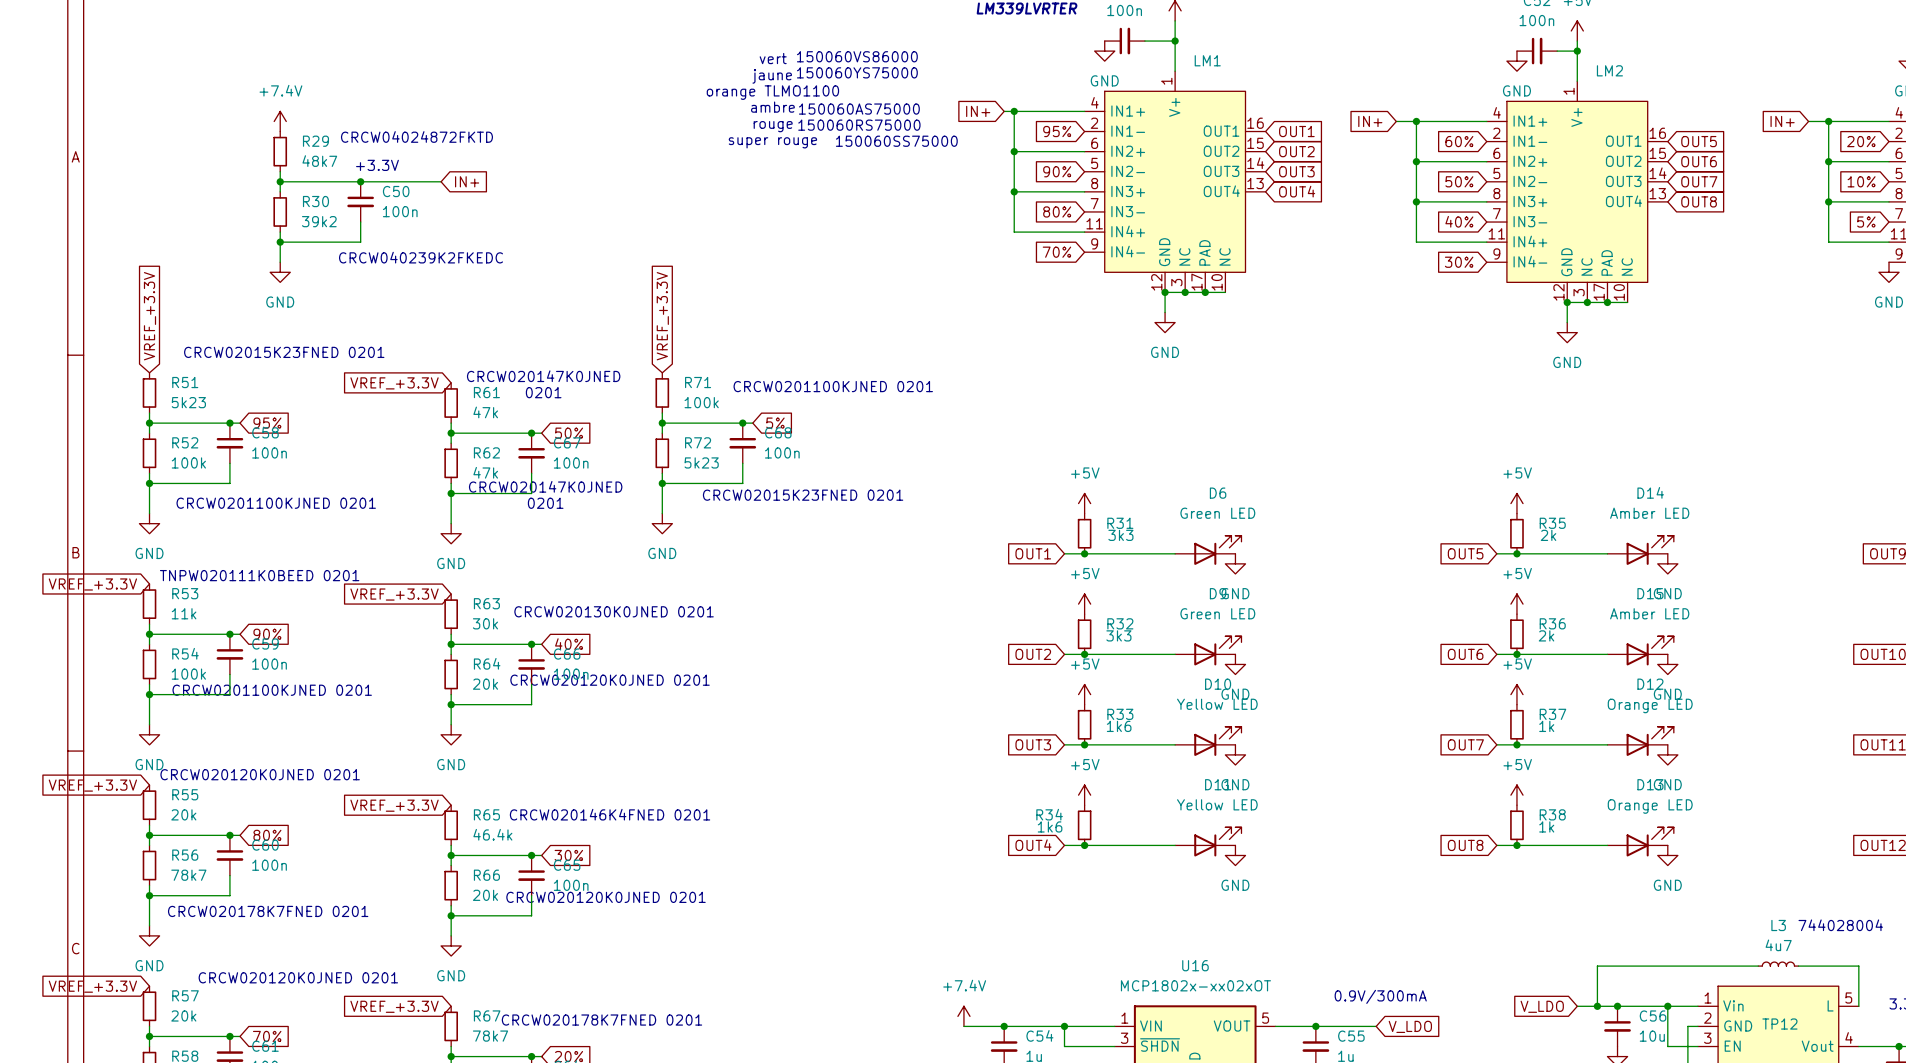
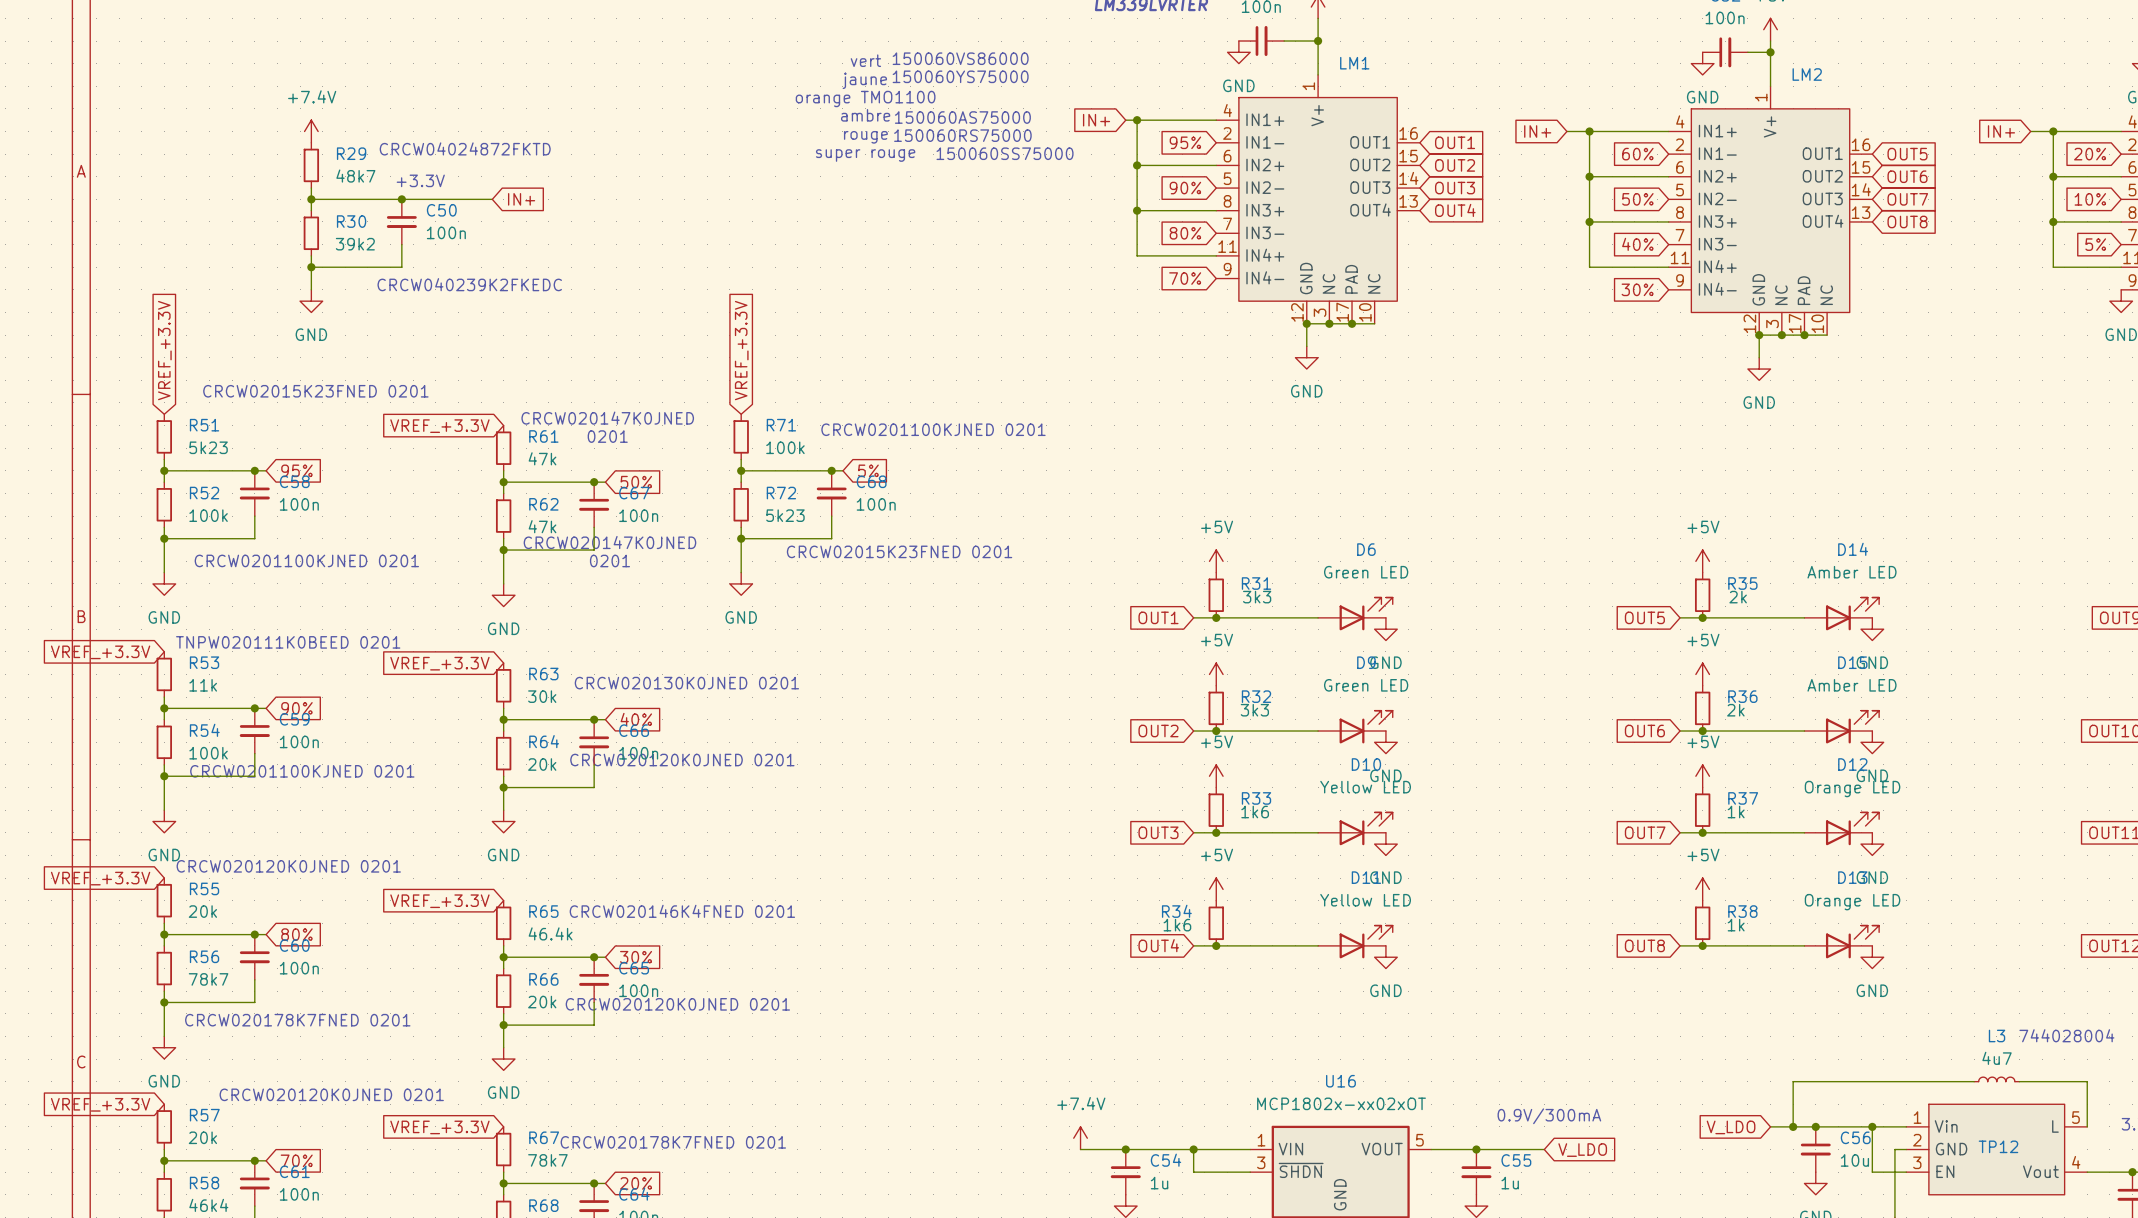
text: orange TLMO1100 (772, 92) -> orange TMO1100 (865, 99)

